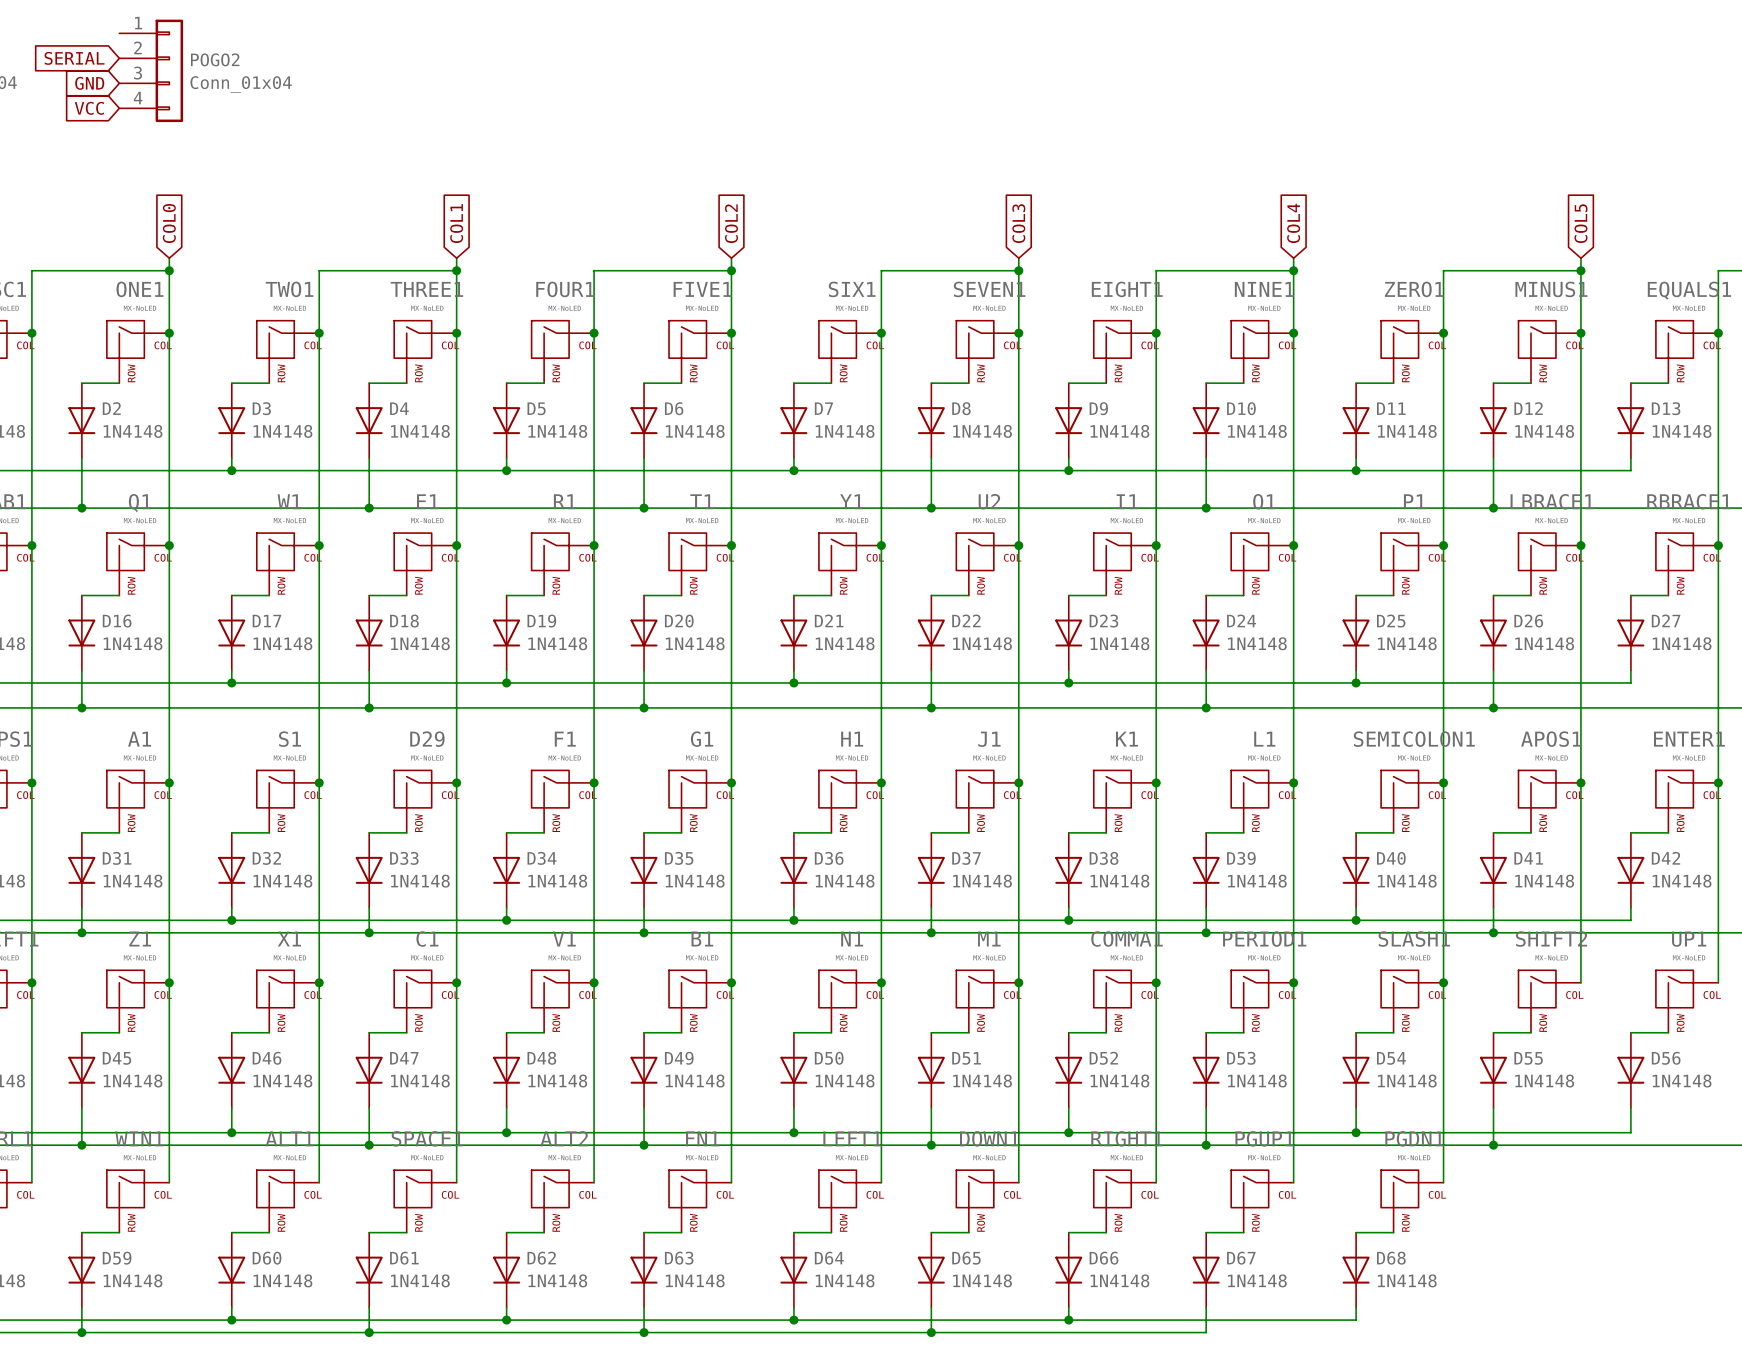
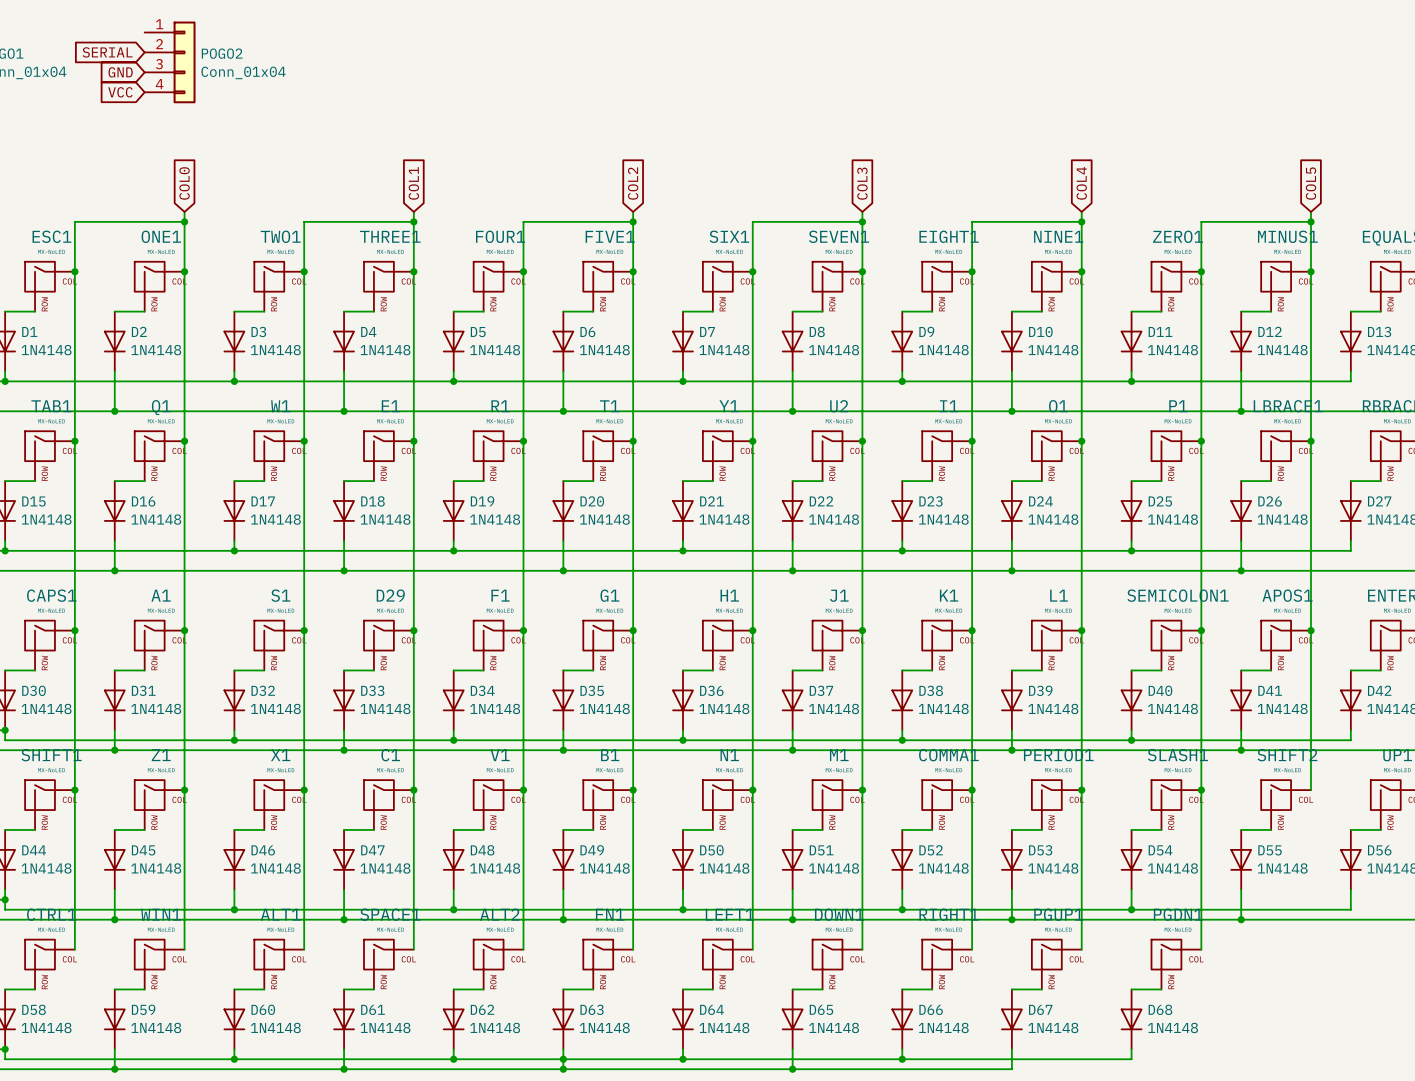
junction: none -> (563, 1059)

